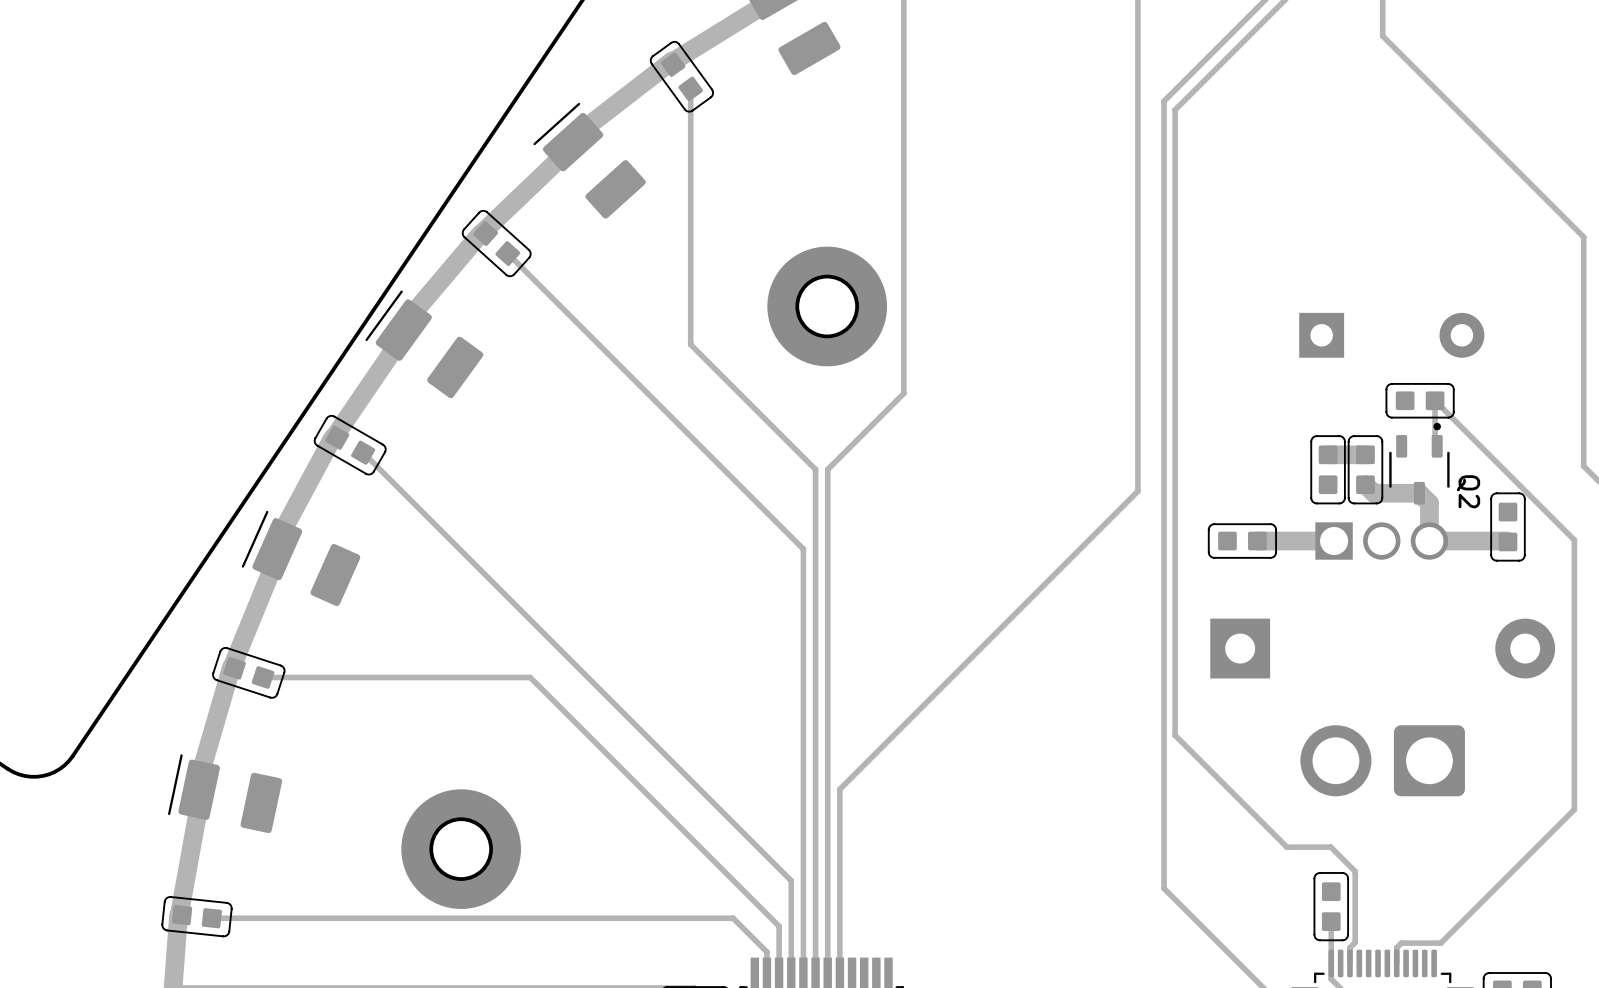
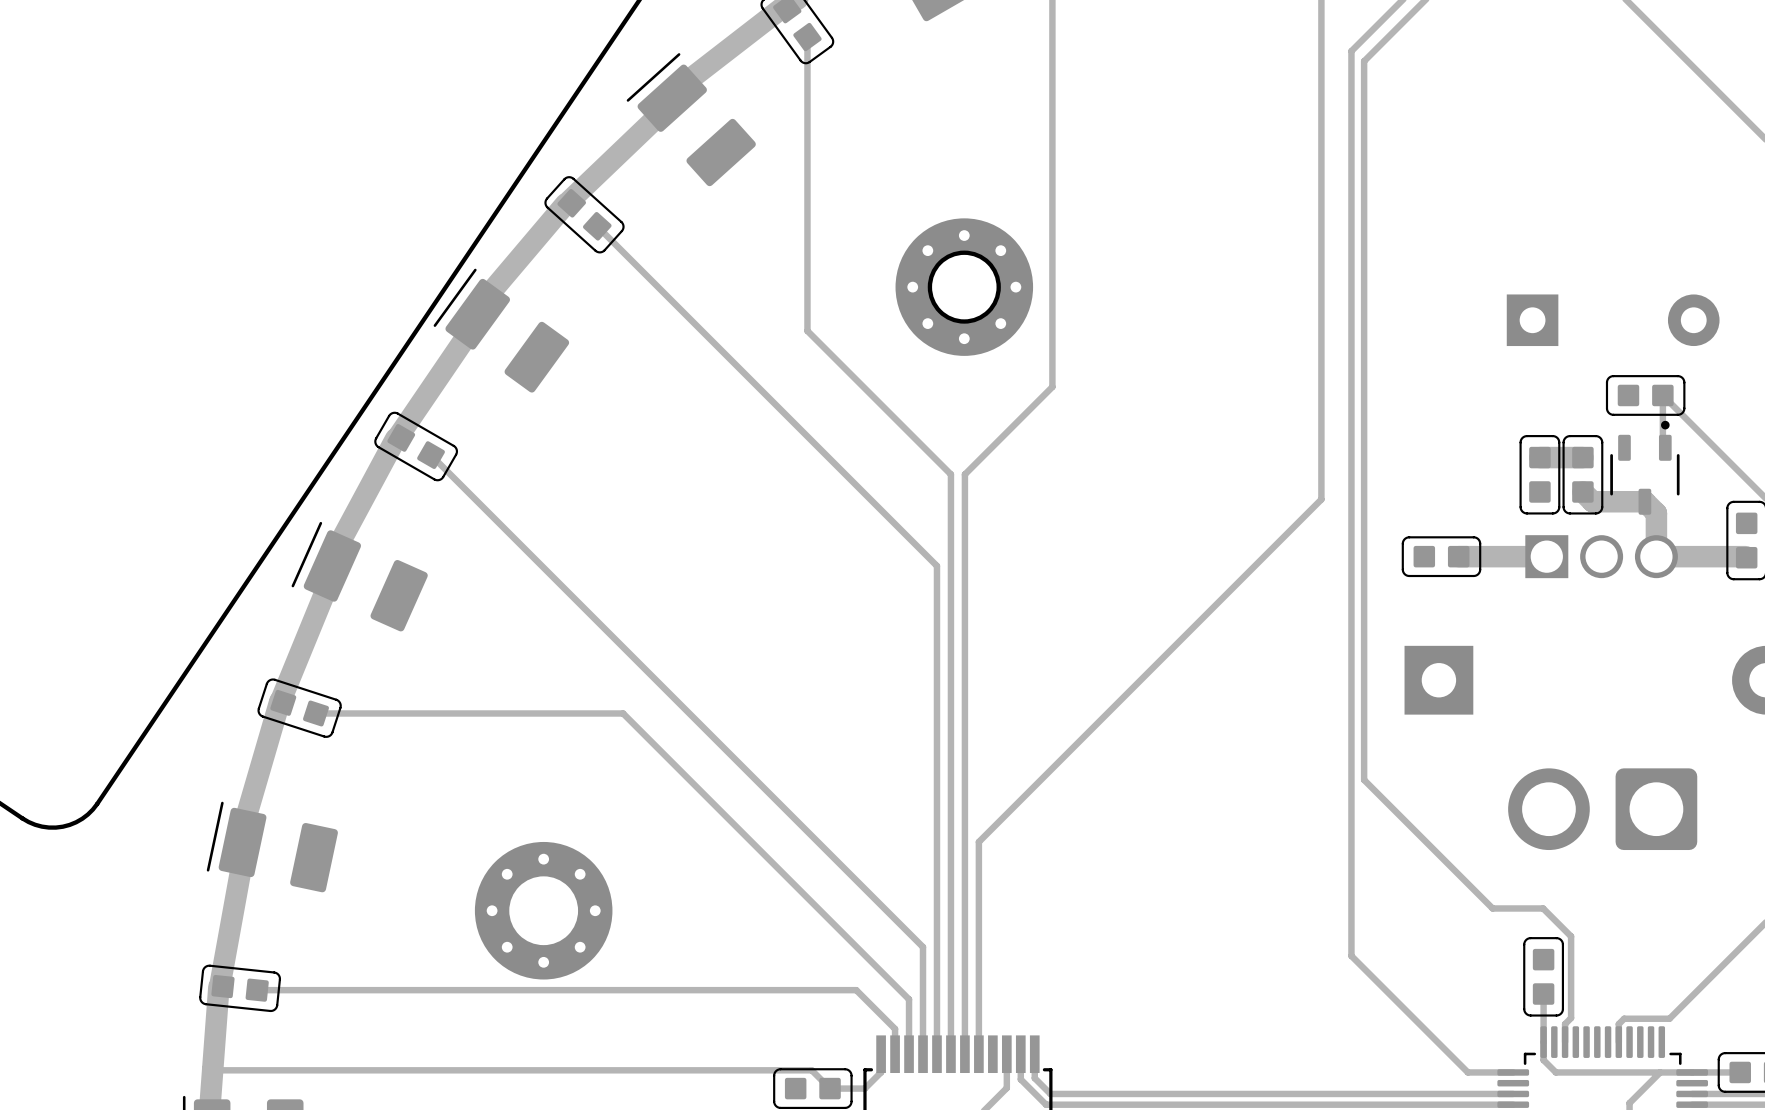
part footprint: [767, 246, 888, 367] -> [895, 218, 1034, 356]
Q2 name: Q2 (1468, 491) -> none
part footprint: [401, 789, 522, 909] -> [474, 841, 613, 980]
round board edge: [429, 817, 493, 881] -> none

